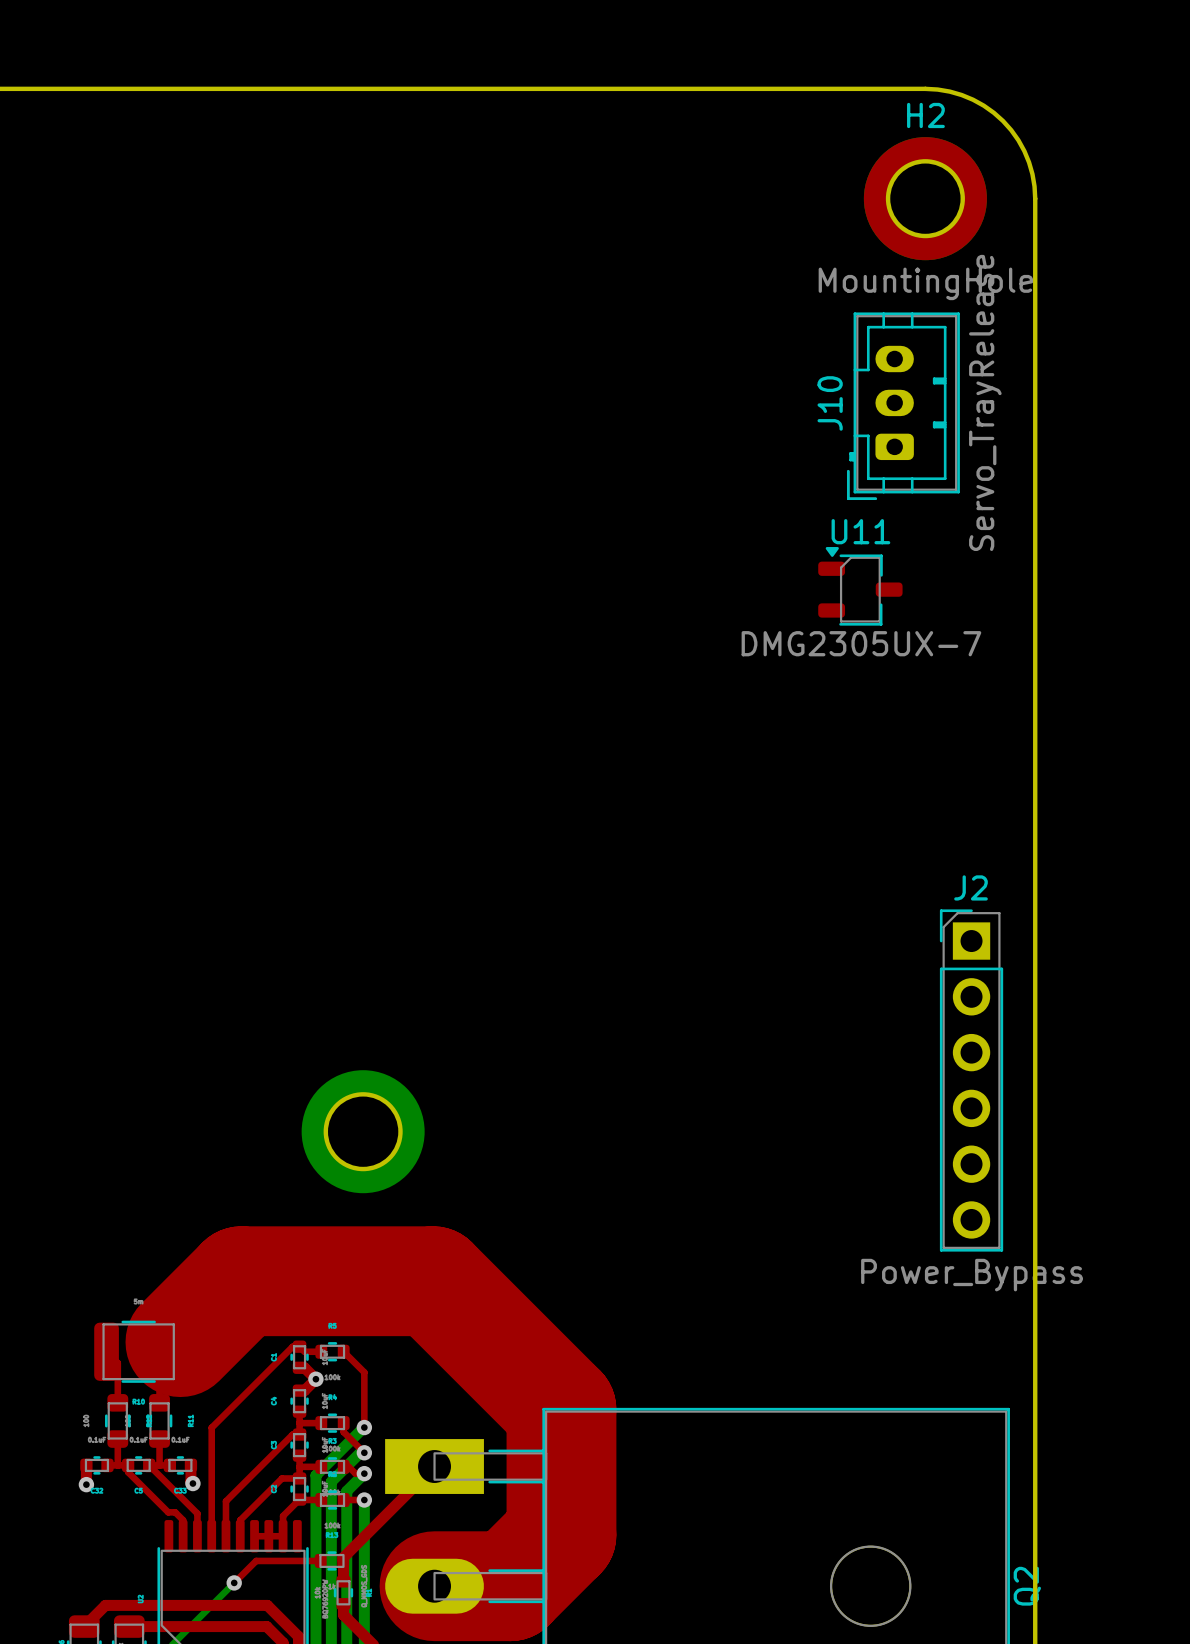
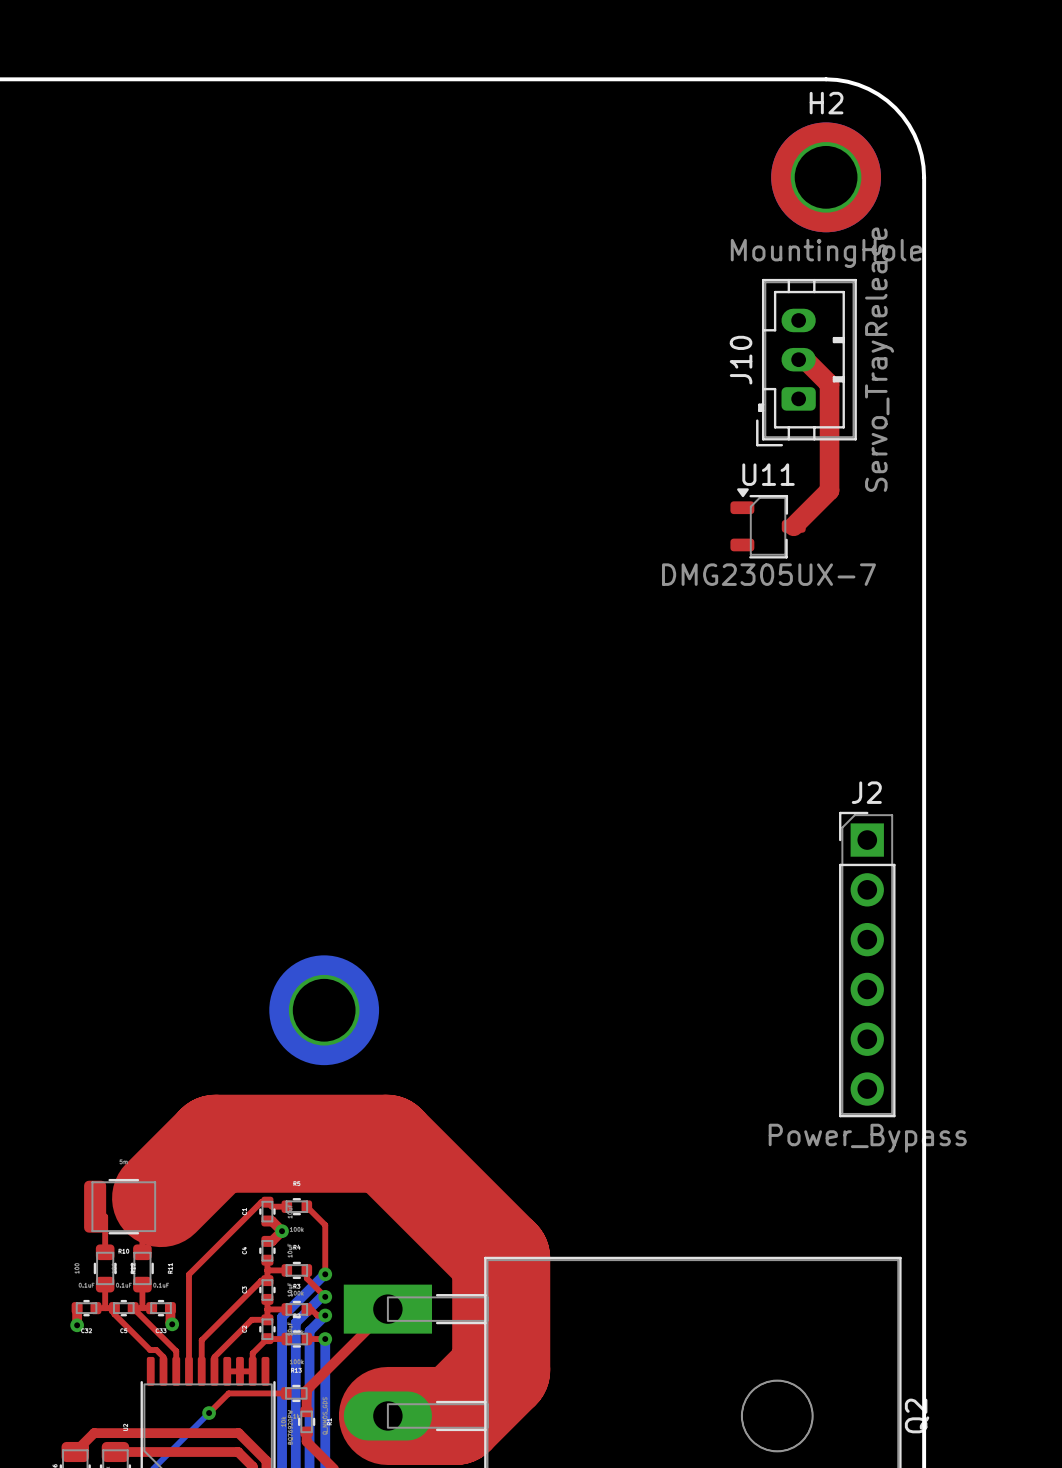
top track: none -> (798, 359) (805, 359) (829, 384) (829, 490) (793, 526)

